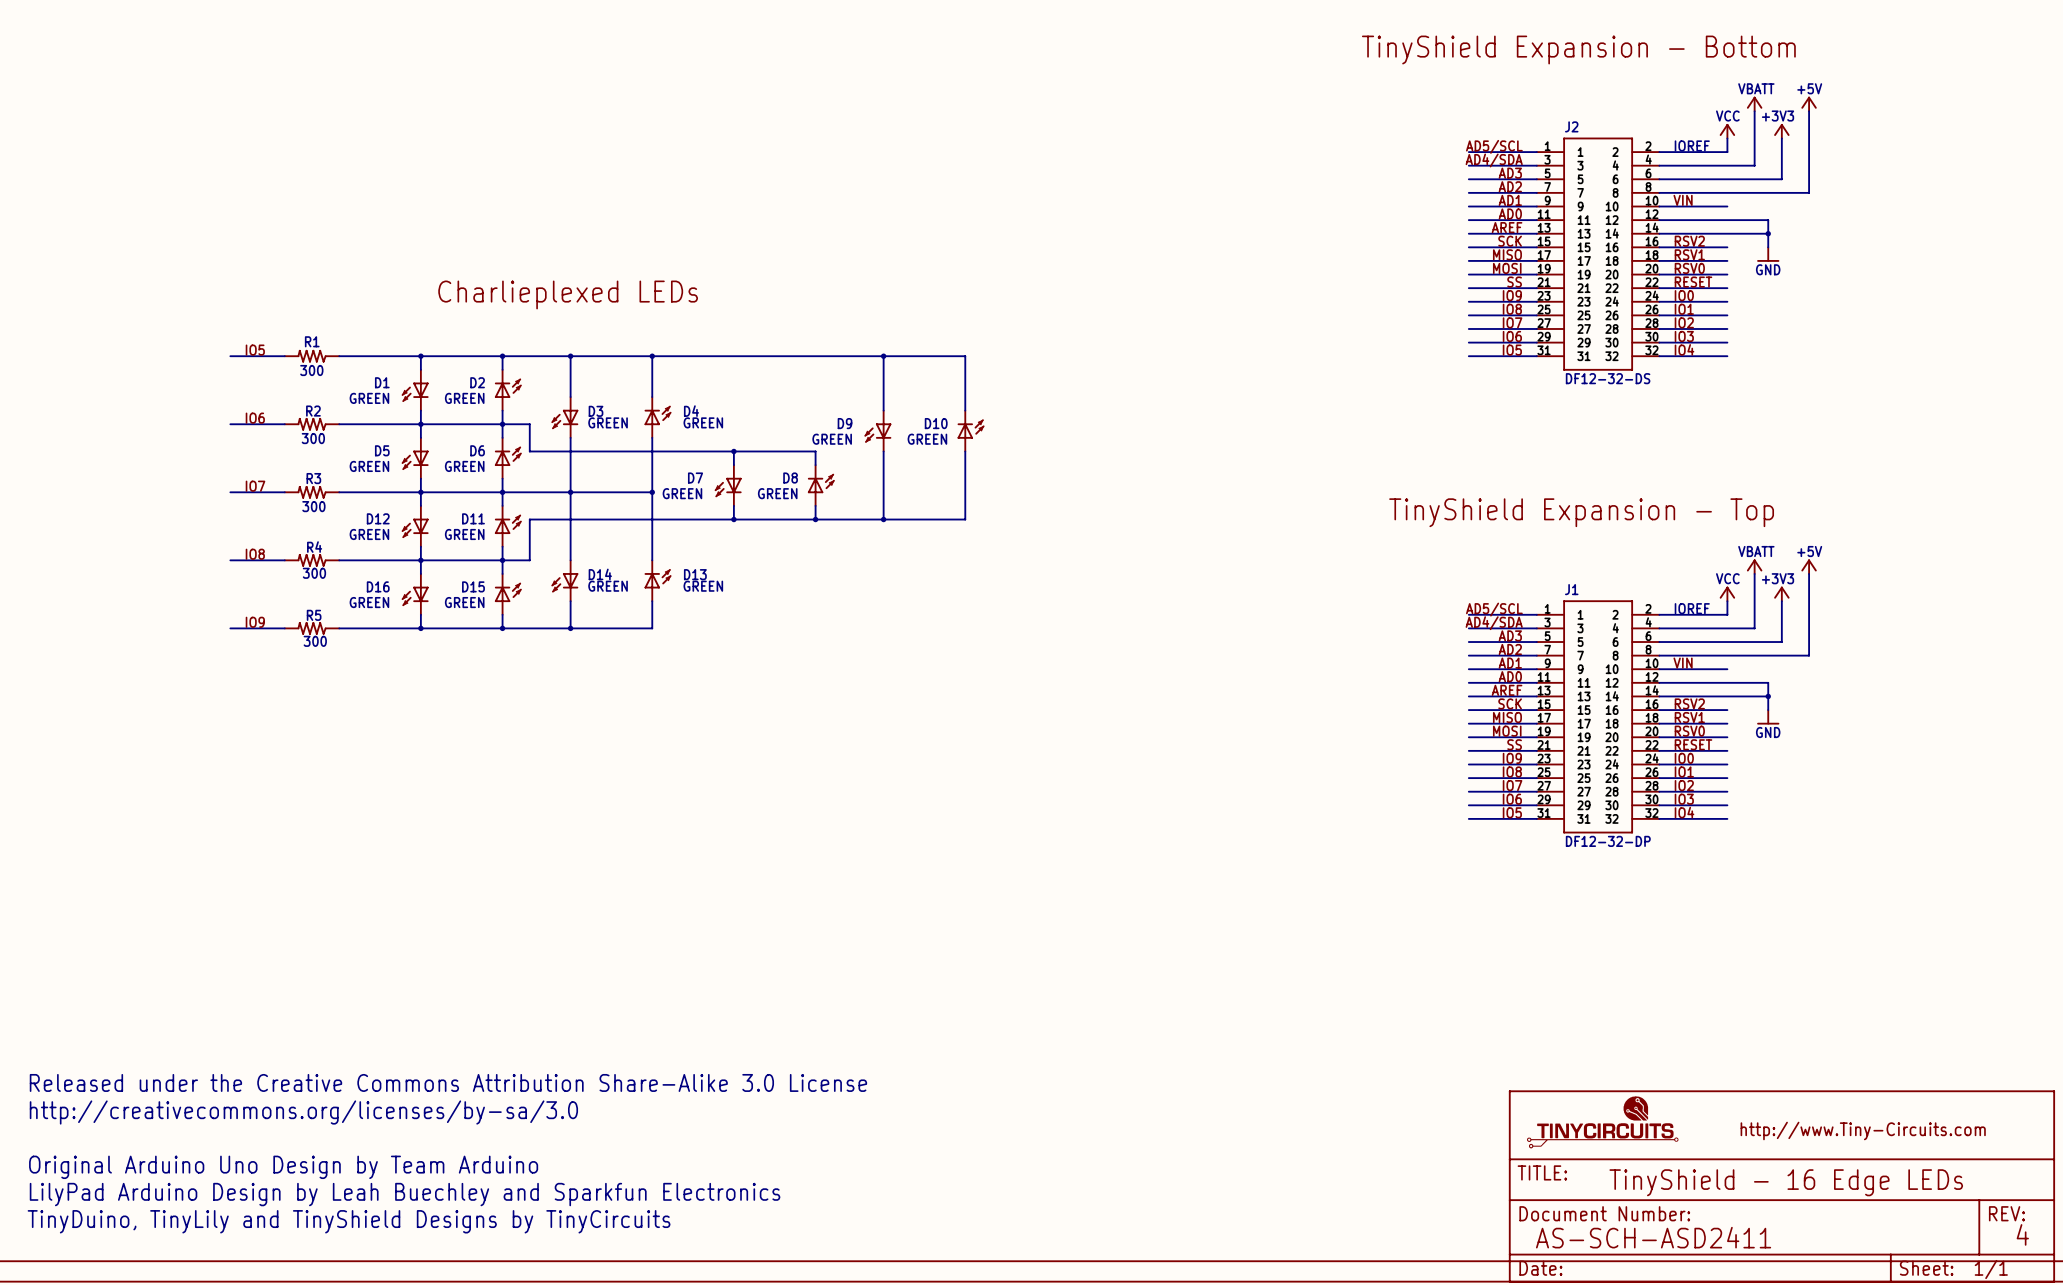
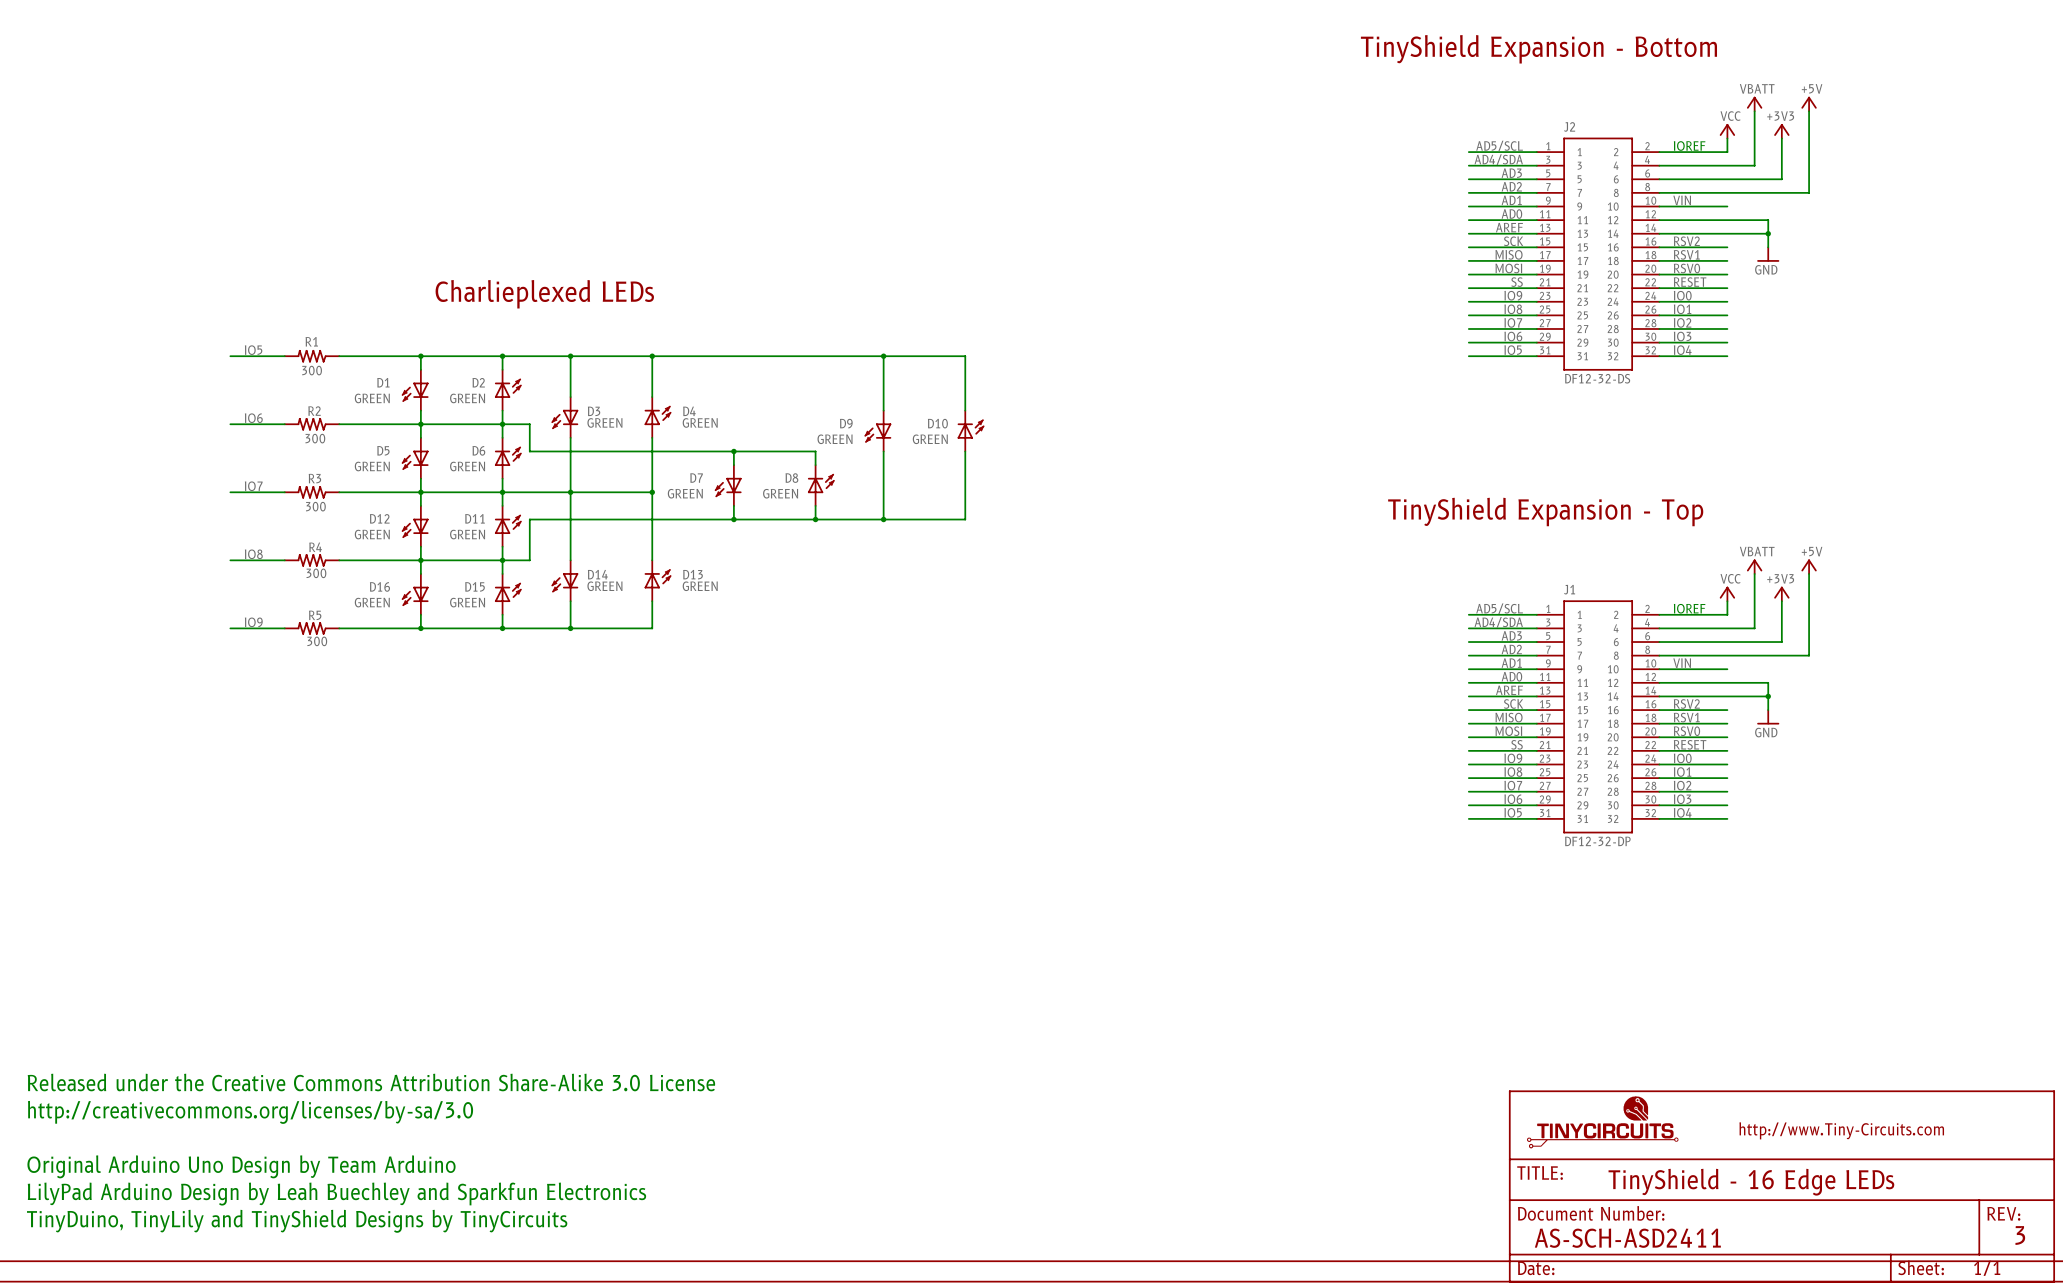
text: 4 (2022, 1234) -> 3 (2020, 1235)

